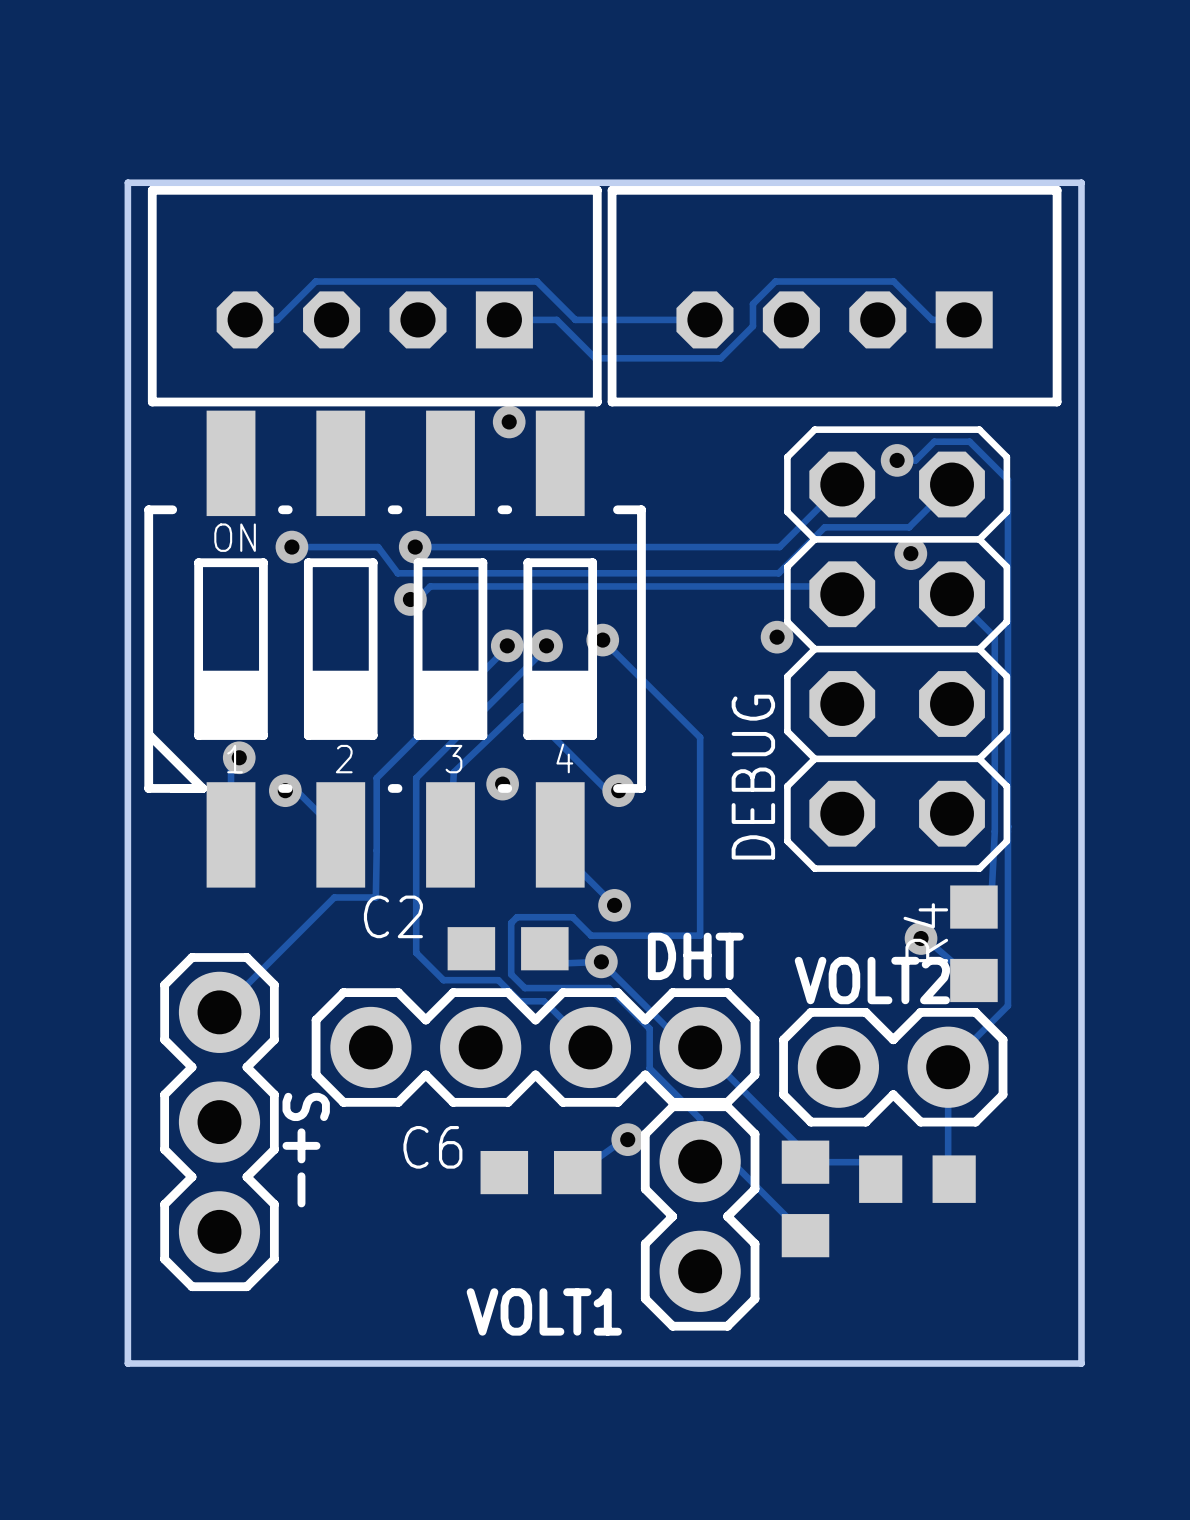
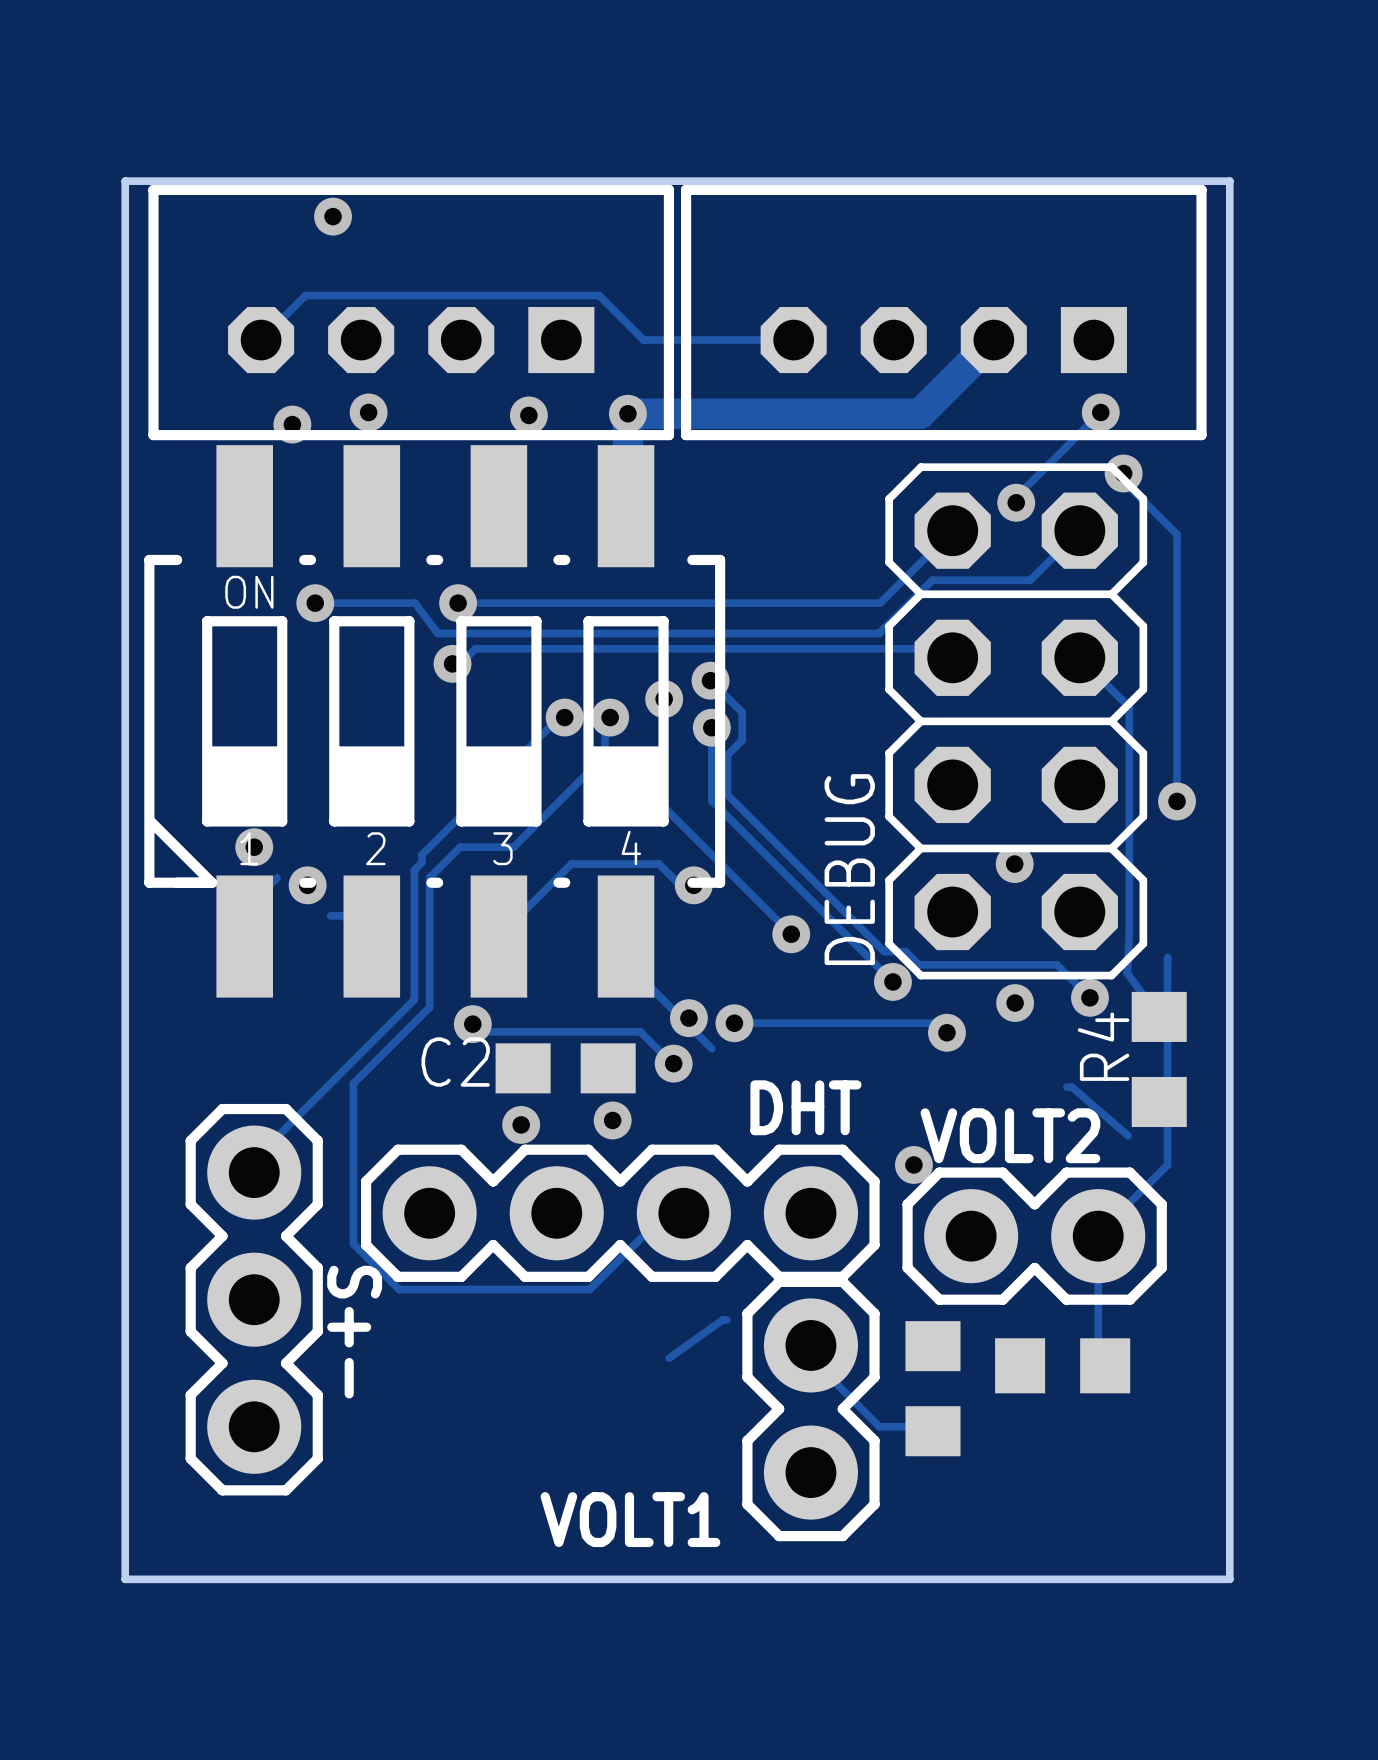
via: none -> (333, 216)
track: none -> (261, 340) (305, 295) (599, 295) (643, 340) (793, 340)
track: none -> (993, 340) (920, 413) (627, 413) (627, 504) (626, 506)
part position: (374, 296) -> (411, 312)
part position: (834, 296) -> (943, 312)
track: (245, 319) (277, 319) (315, 281) (537, 281) (575, 319) (704, 319) -> none
track: (504, 319) (556, 319) (595, 358) (720, 358) (752, 326) (752, 304) (775, 281) (893, 281) (932, 319) (964, 319) -> none
via: none -> (368, 412)
track: none -> (1100, 412) (1016, 496) (1016, 502)
via: none -> (1100, 412)
via: none -> (627, 413)
via: none -> (528, 415)
via: none -> (292, 424)
track: none -> (1123, 473) (1123, 481) (1177, 534) (1177, 801)
via: none -> (1123, 473)
via: (509, 421) -> none
track: none -> (952, 530) (880, 603) (458, 603)
track: (897, 460) (915, 460) (934, 441) (969, 441) (1007, 479) (1007, 826) -> none
via position: (897, 460) -> (1016, 502)
track: (842, 484) (779, 547) (758, 546) -> (1079, 530) (1030, 580) (932, 580) (879, 633)
track: (952, 484) (909, 527) (824, 527) (778, 573) (397, 573) (378, 547) (291, 547) -> none
track: none -> (315, 603) (415, 603) (437, 633) (480, 633)
via: none -> (458, 603)
via position: (291, 547) -> (315, 603)
via: (415, 547) -> none
via: (910, 553) -> none
track: none -> (1079, 657) (1129, 707) (1129, 932) (1127, 973) (1159, 1016)
via: none -> (452, 663)
track: none -> (710, 680) (742, 712) (742, 740) (727, 755) (727, 794) (884, 951) (905, 951) (918, 964) (1056, 964) (1089, 997)
via: none -> (710, 680)
track: (842, 594) (834, 586) (430, 586) (417, 599) (410, 599) -> (952, 657) (943, 648) (475, 648) (460, 663) (452, 663)
track: (952, 594) (994, 637) (994, 831) (992, 886) (973, 907) -> none
via: (410, 599) -> none
track: none -> (664, 699) (664, 807) (791, 934)
via: none -> (664, 699)
via: none -> (564, 717)
via: none -> (610, 717)
track: none -> (711, 727) (711, 800) (892, 981)
via: (777, 637) -> none
track: (602, 640) (700, 737) (700, 935) (591, 935) (572, 917) (516, 917) (511, 923) (511, 974) (524, 988) (608, 988) (649, 1028) (649, 1068) (700, 1118) (700, 1161) (731, 1161) (805, 1235) -> (810, 1345) (810, 1358) (879, 1426) (932, 1426) (932, 1431)
via position: (602, 640) -> (711, 727)
track: (507, 645) (376, 778) (375, 897) (334, 897) (219, 1012) -> (564, 717) (559, 717) (422, 854) (422, 862) (414, 870) (414, 999) (254, 1159) (254, 1172)
via: (507, 645) -> none
track: (546, 645) (416, 778) (416, 952) (443, 980) (498, 980) (519, 1001) (544, 1001) (590, 1047) -> (610, 717) (605, 717) (605, 755) (513, 847) (460, 847) (429, 877) (429, 1007) (353, 1083) (353, 1243) (399, 1289) (589, 1289) (666, 1213) (683, 1213)
via: (546, 645) -> none
part position: (395, 649) -> (434, 721)
DEBUG position: (897, 649) -> (1016, 721)
via: none -> (1177, 801)
via: none -> (254, 847)
via: none -> (1014, 864)
via: (239, 757) -> none
via: none -> (307, 885)
track: none -> (693, 885) (680, 885) (659, 864) (571, 864) (498, 936)
via: (502, 784) -> none
via: (285, 790) -> none
track: (618, 790) (607, 790) (522, 706) (453, 772) (450, 834) -> none
via position: (618, 790) -> (693, 885)
via: none -> (791, 934)
via: none -> (892, 981)
via: none -> (1089, 997)
via: none -> (1015, 1003)
via: none -> (688, 1018)
track: none -> (734, 1023) (937, 1023) (946, 1032)
via: none -> (734, 1023)
track: none -> (472, 1024) (480, 1031) (640, 1031) (673, 1063)
via: none -> (472, 1024)
via: none -> (946, 1032)
via: (614, 905) -> none
via: none -> (673, 1063)
via: (921, 938) -> none
R4 position: (973, 943) -> (1159, 1059)
C2 position: (508, 948) -> (565, 1068)
track: (544, 948) (553, 957) (555, 963) (601, 961) (686, 1047) (700, 1047) (805, 1152) (805, 1162) (863, 1162) (880, 1179) -> none
via: (601, 961) -> none
via: none -> (612, 1120)
via: none -> (521, 1124)
via: none -> (913, 1164)
via: (627, 1139) -> none
C6: (541, 1172) -> none
board edge: (127, 1363) (127, 182) (1081, 182) (1081, 1363) (1061, 1363) -> (148, 1579) (125, 1579) (125, 181) (1229, 181) (1229, 1579)

